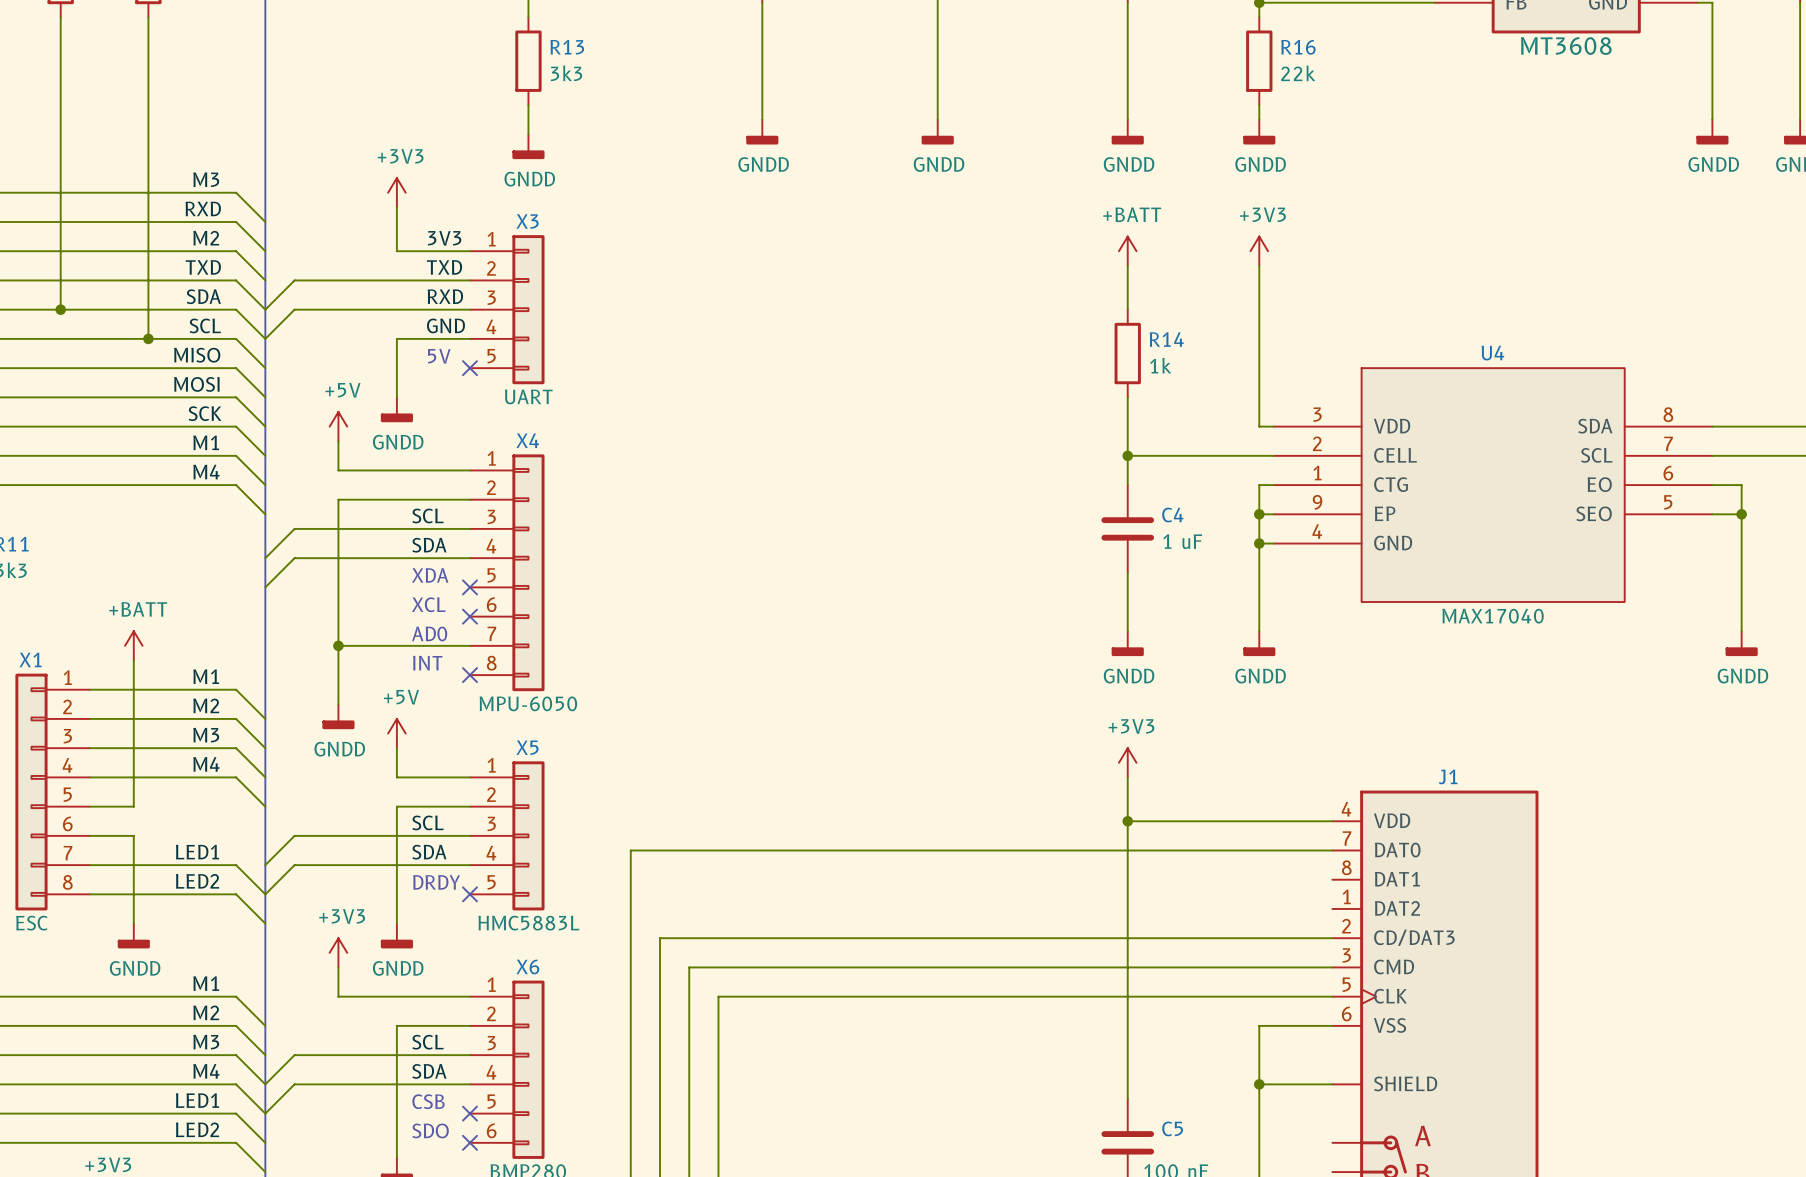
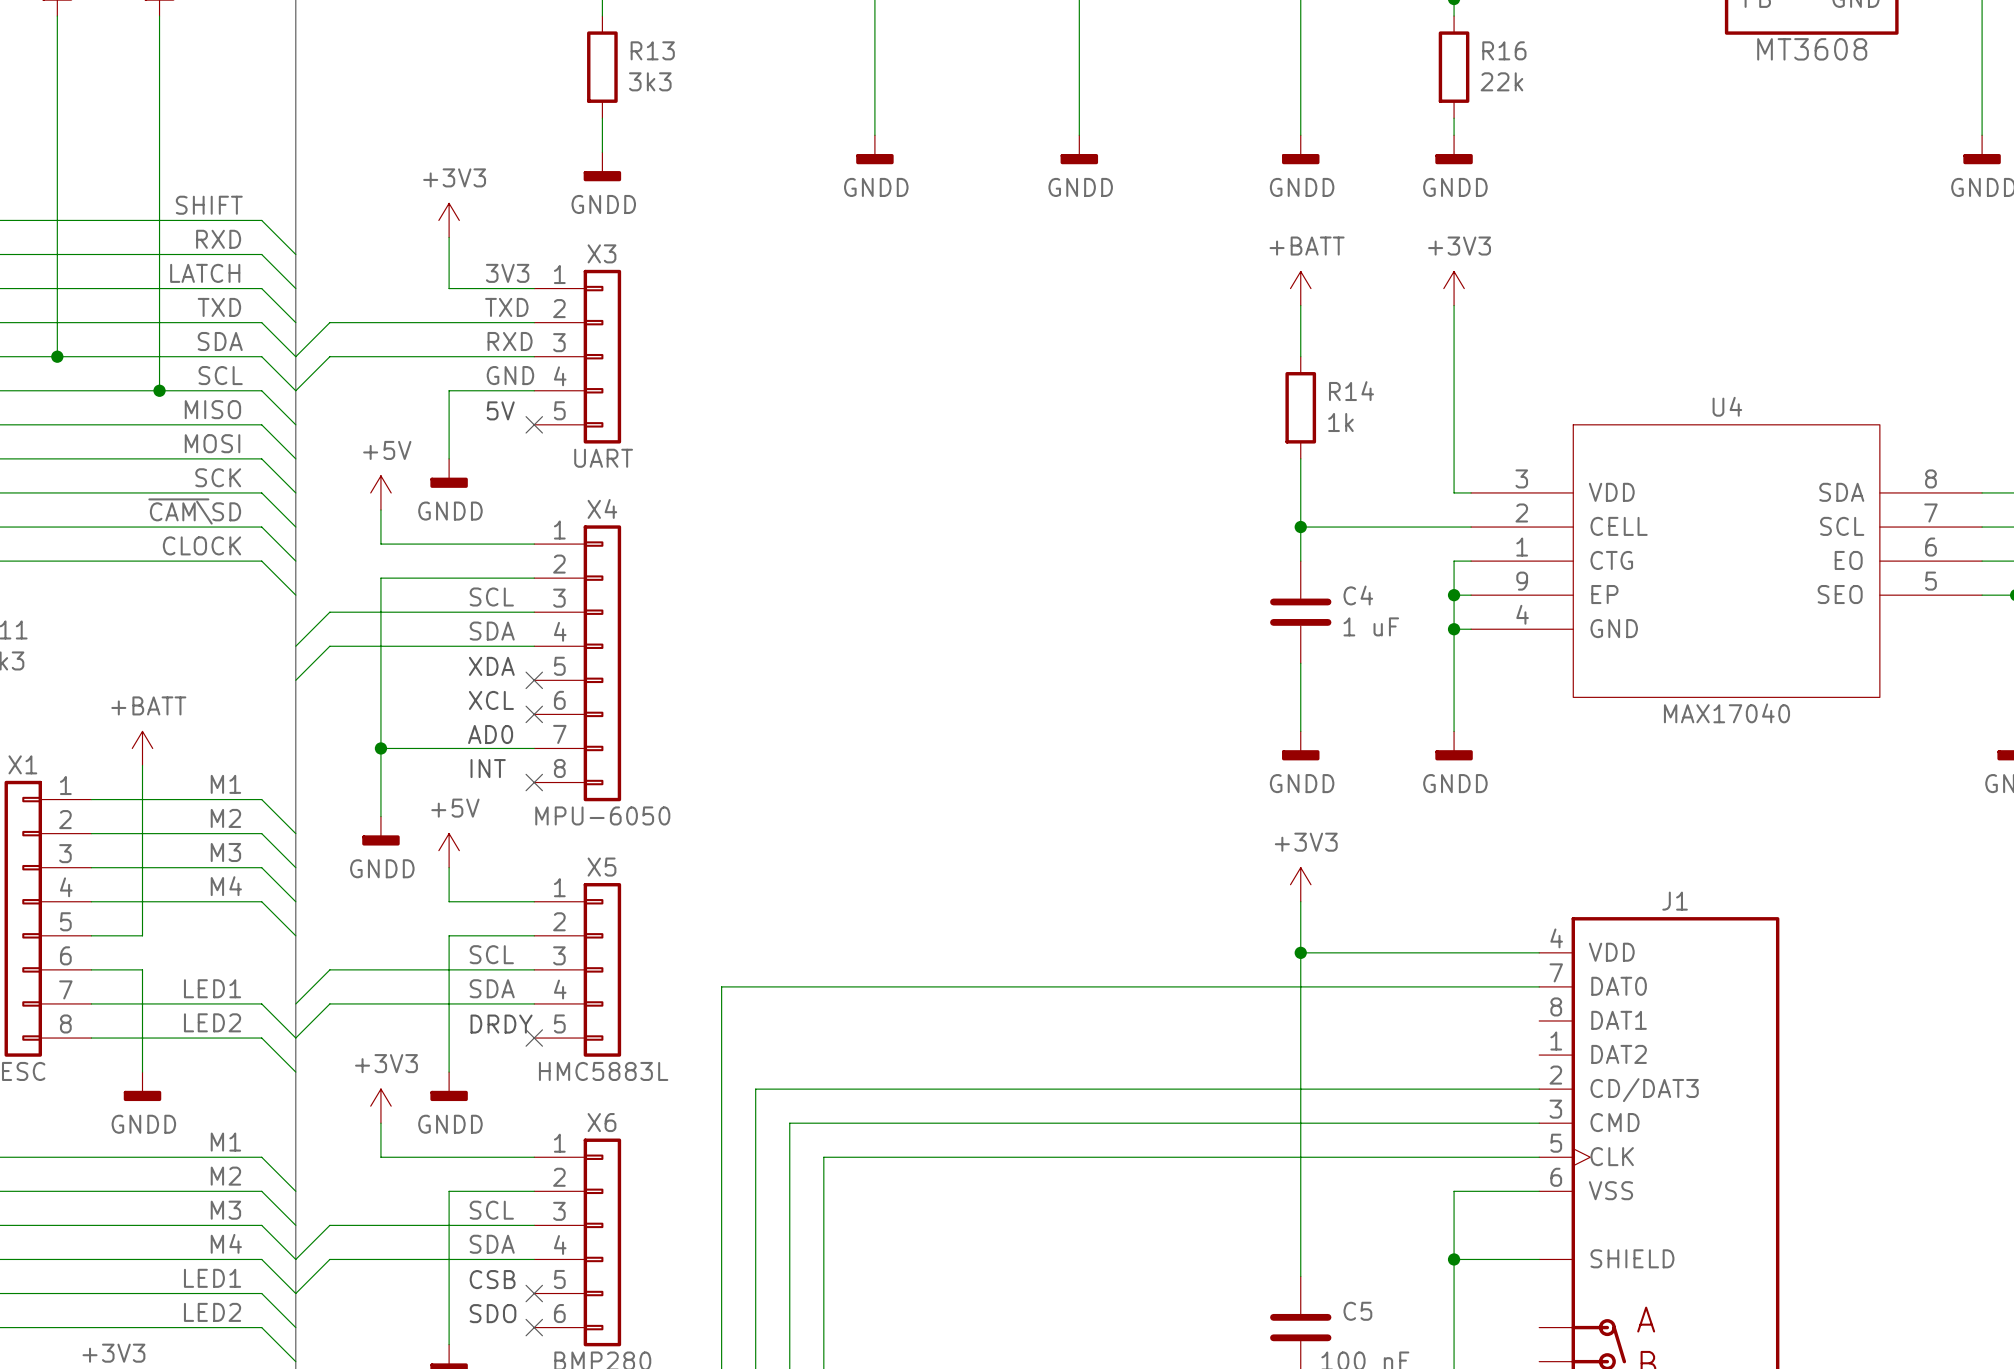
label: M3 (206, 179) -> SHIFT (209, 205)
label: M2 (206, 238) -> LATCH (205, 273)
label: M1 (206, 442) -> ~{CAM\}SD (194, 511)
label: M4 (206, 472) -> CLOCK (201, 545)

